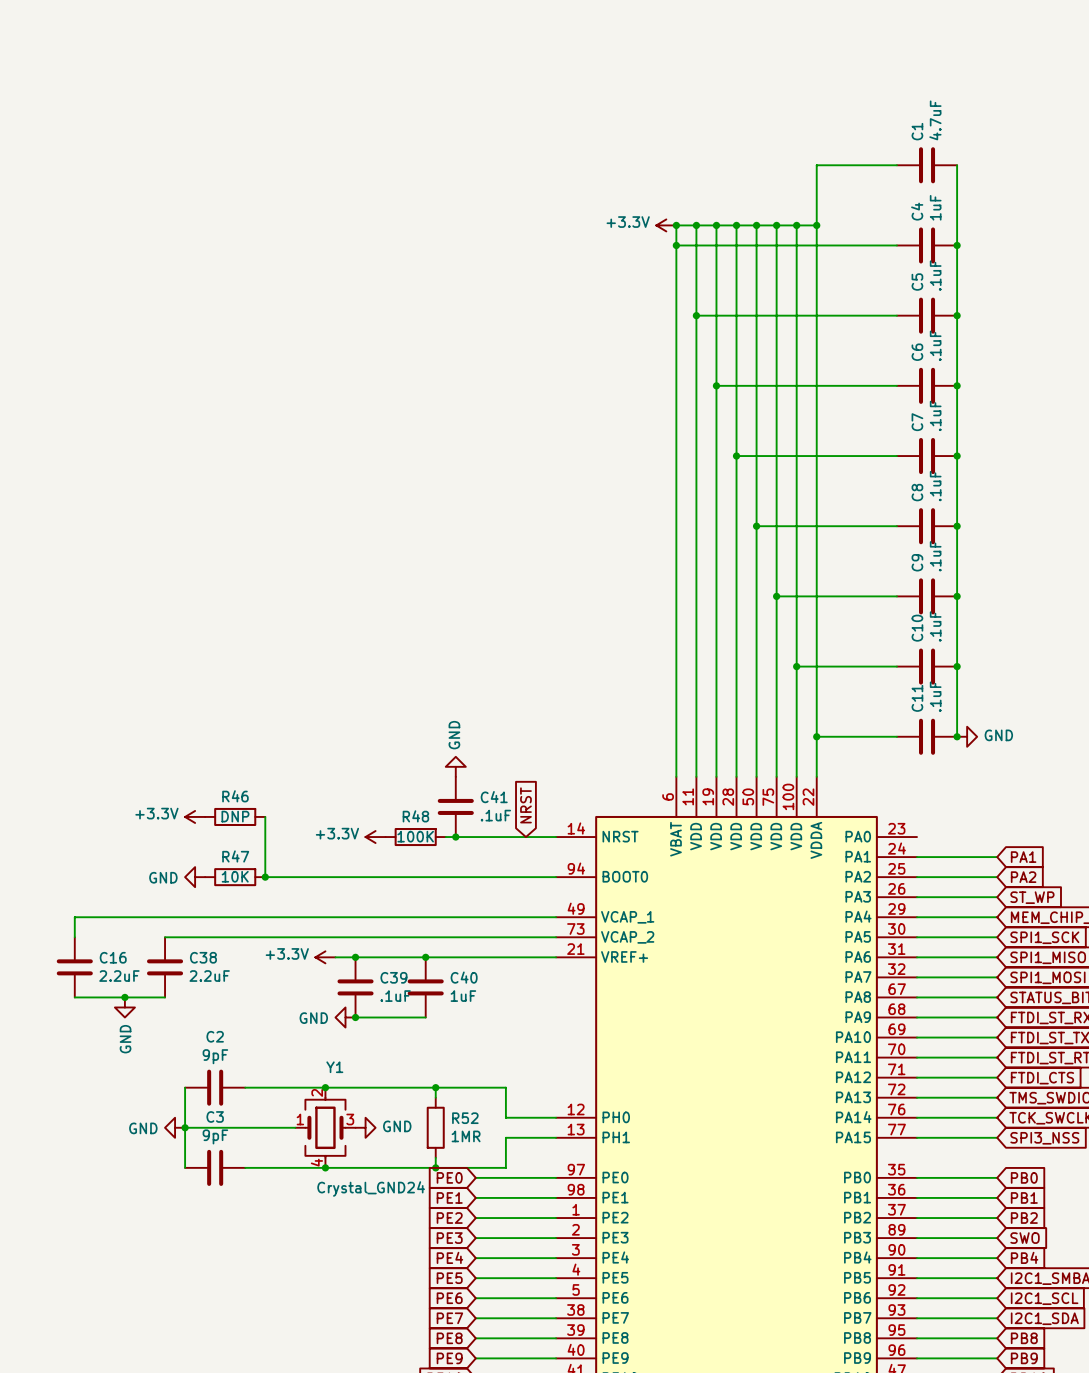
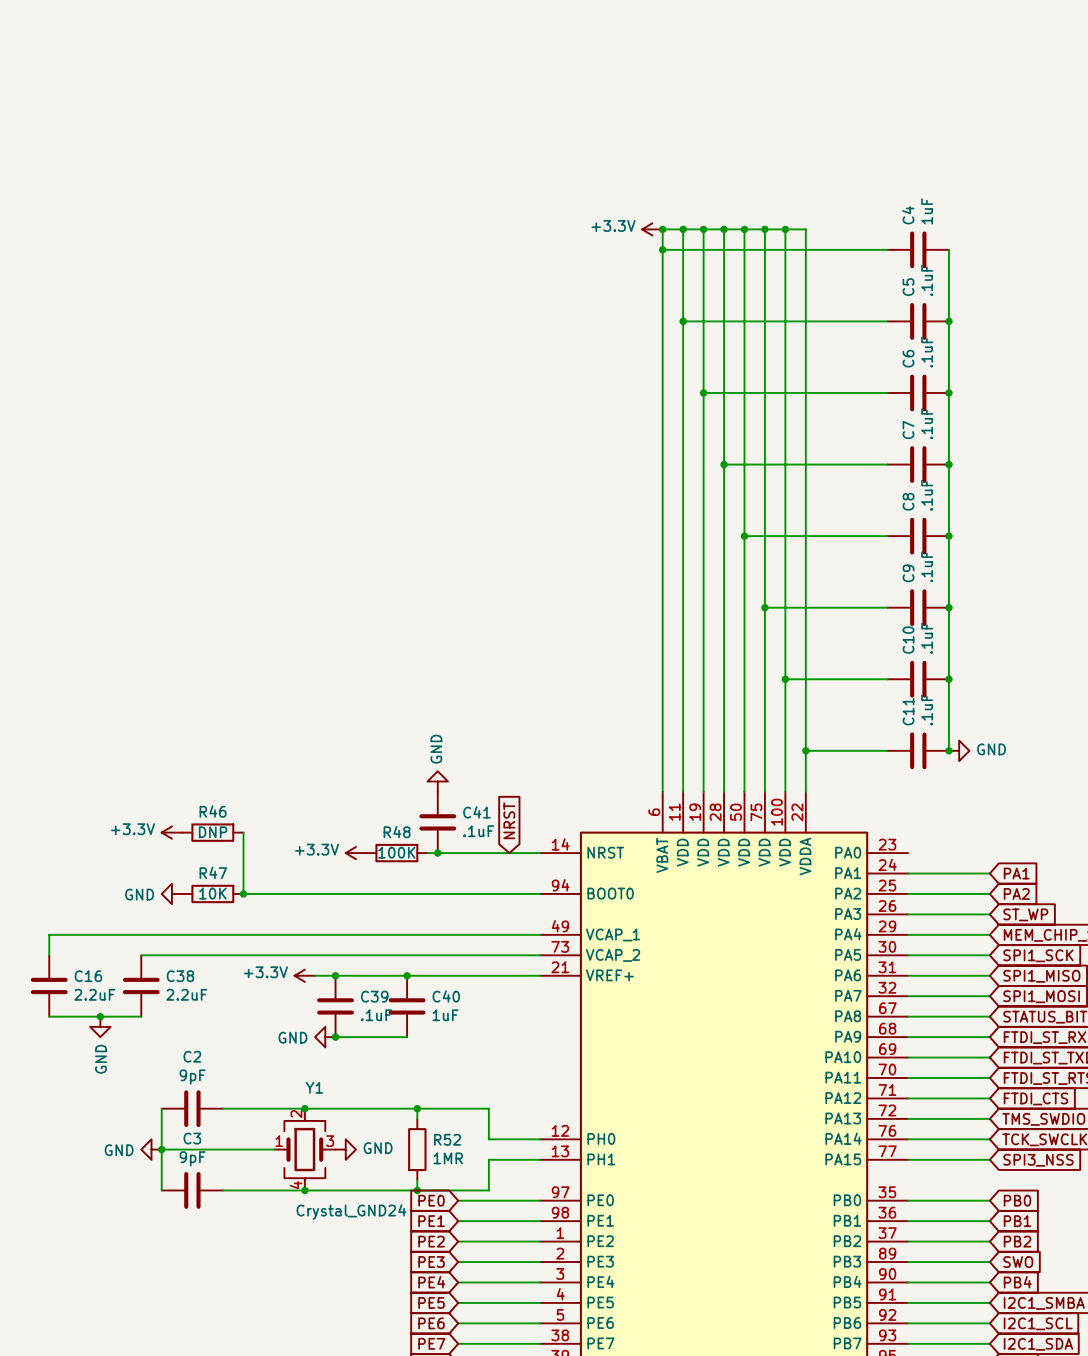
wire: (896, 165) (816, 165) (816, 225) -> none
C1: 4.7uF (927, 165) -> none
wire: (957, 165) (957, 245) -> none
junction: (816, 225) -> none
junction: (957, 245) -> none

